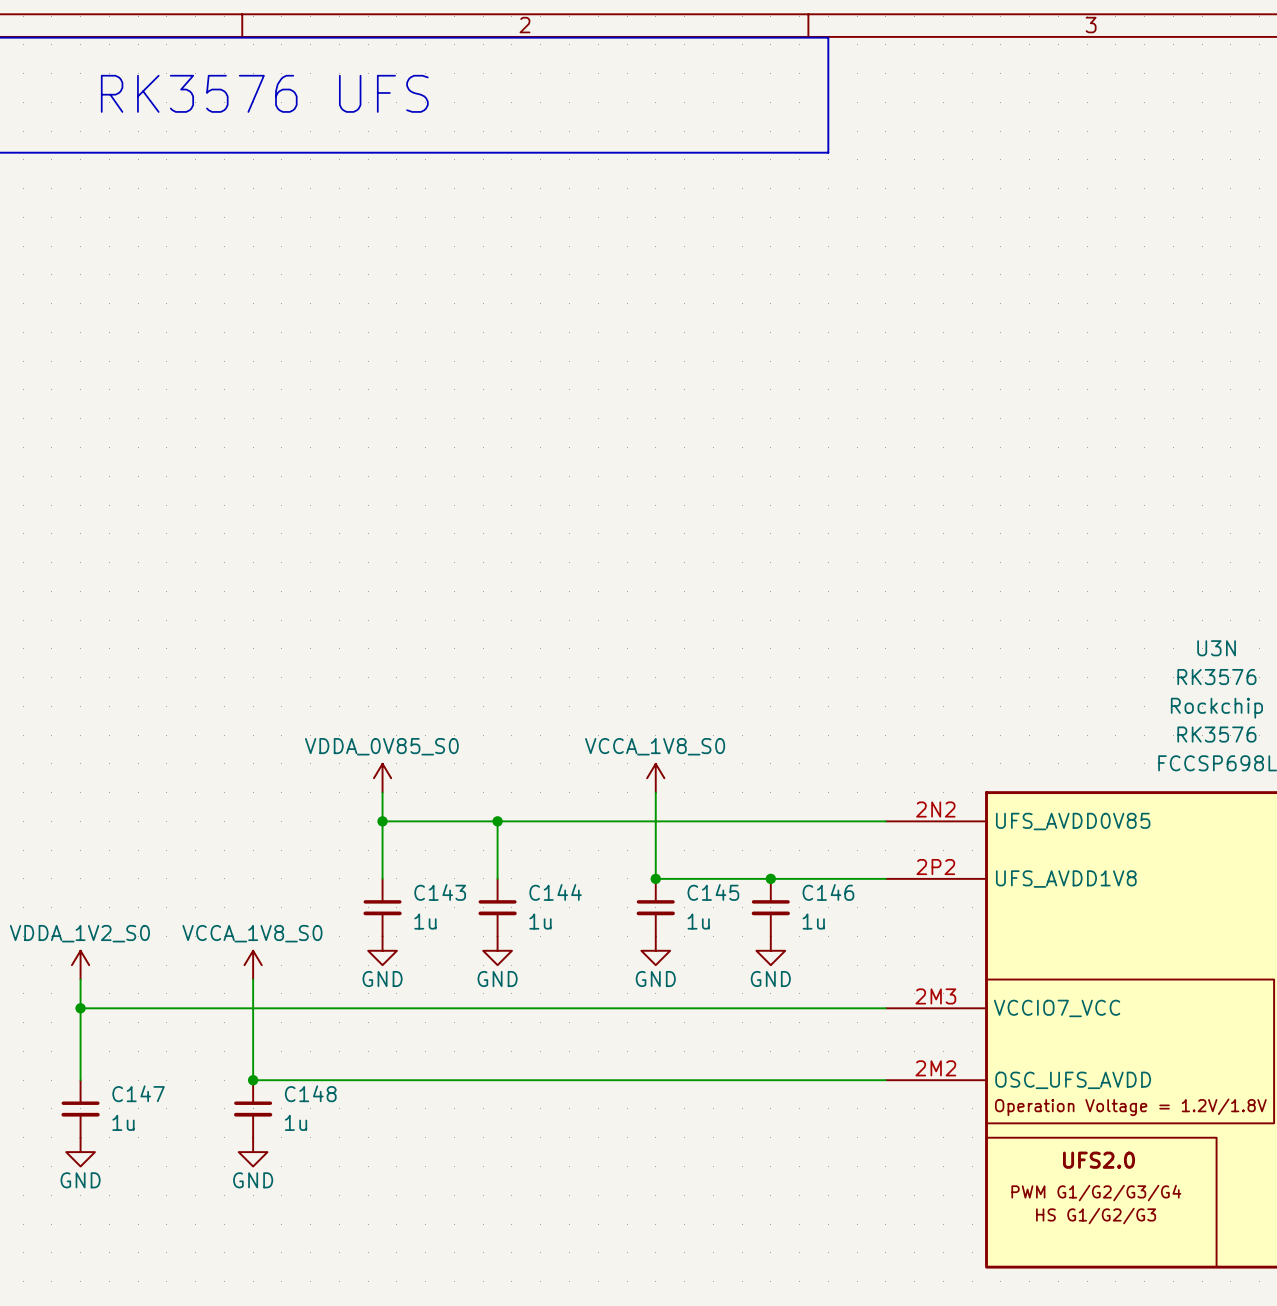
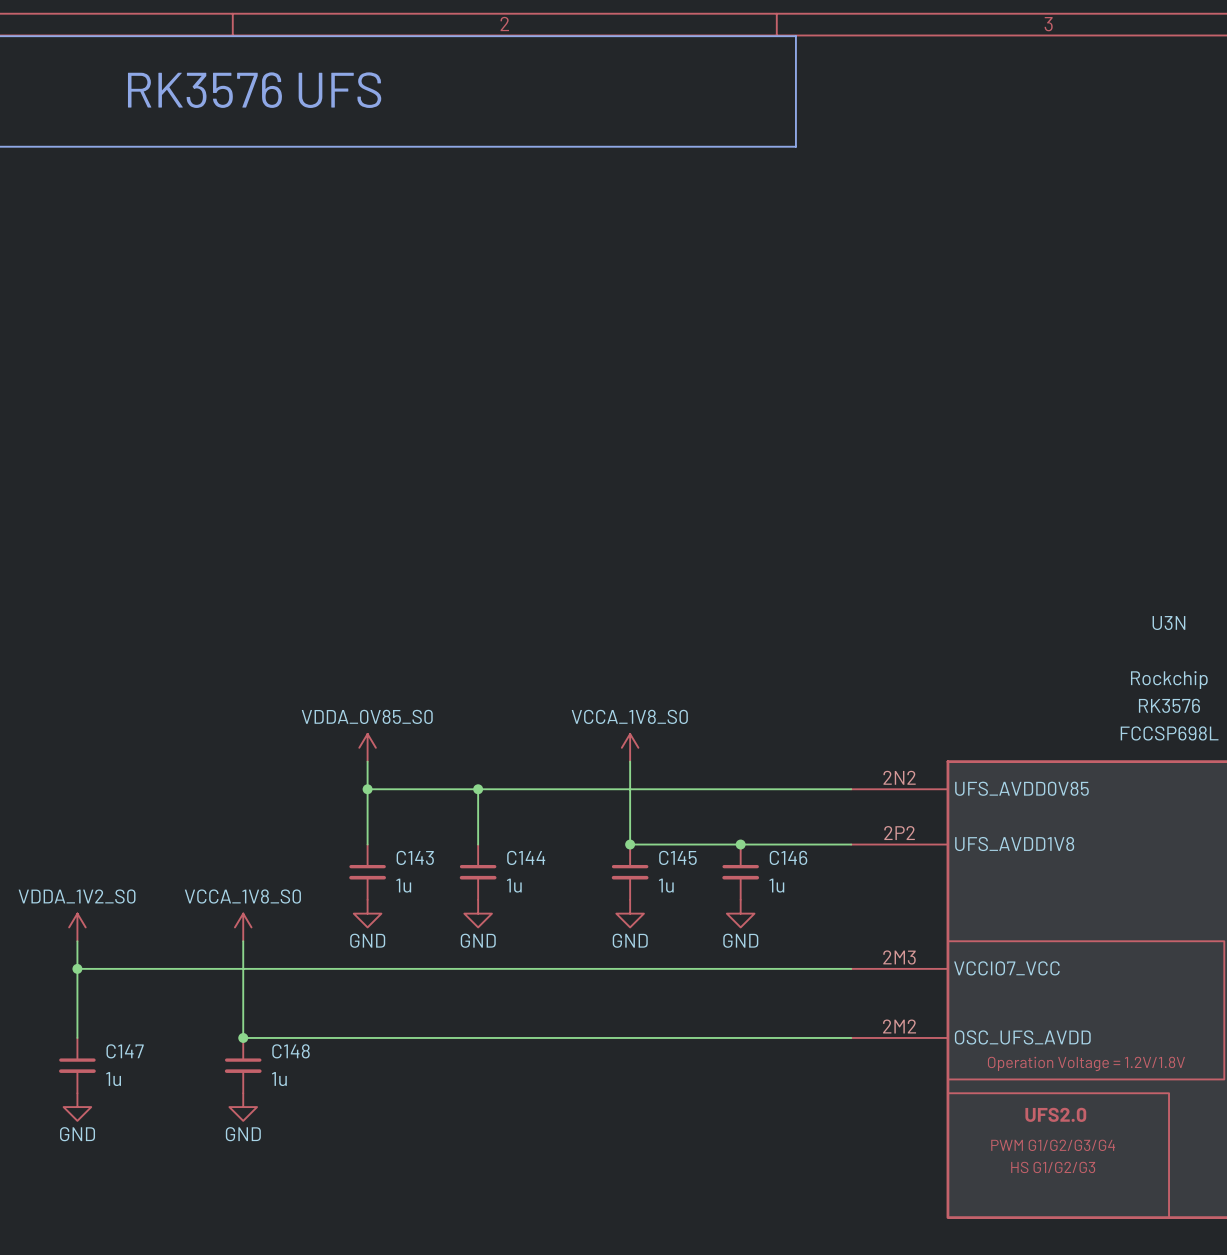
U3N value: RK3576 (1216, 677) -> none

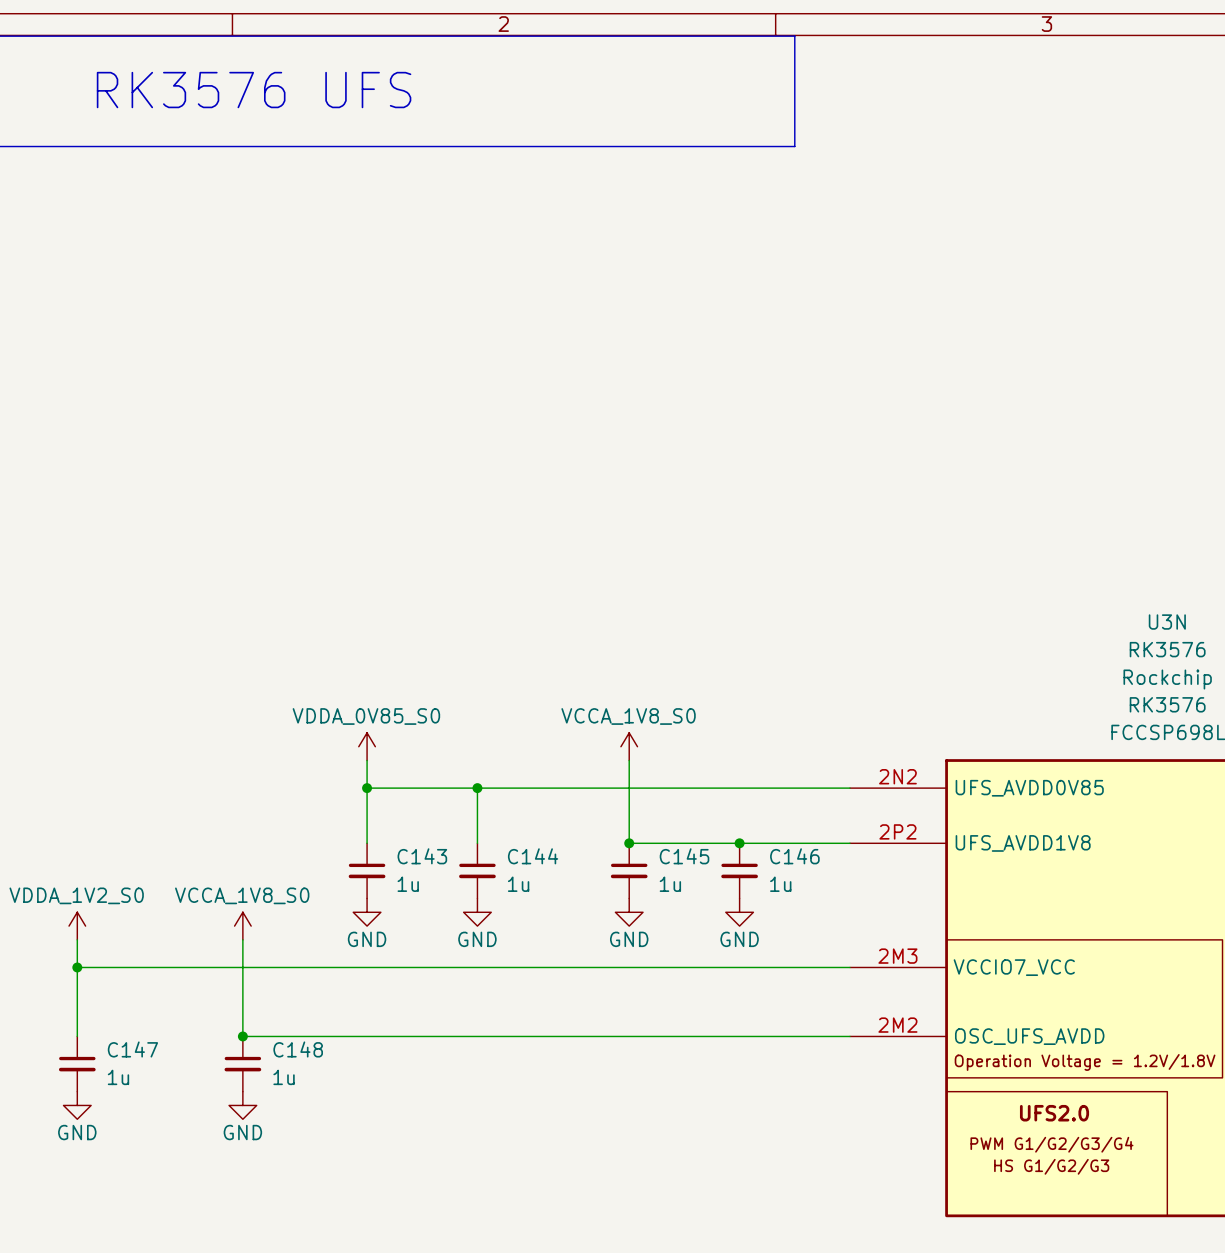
U3N value: none -> RK3576 (1167, 649)

